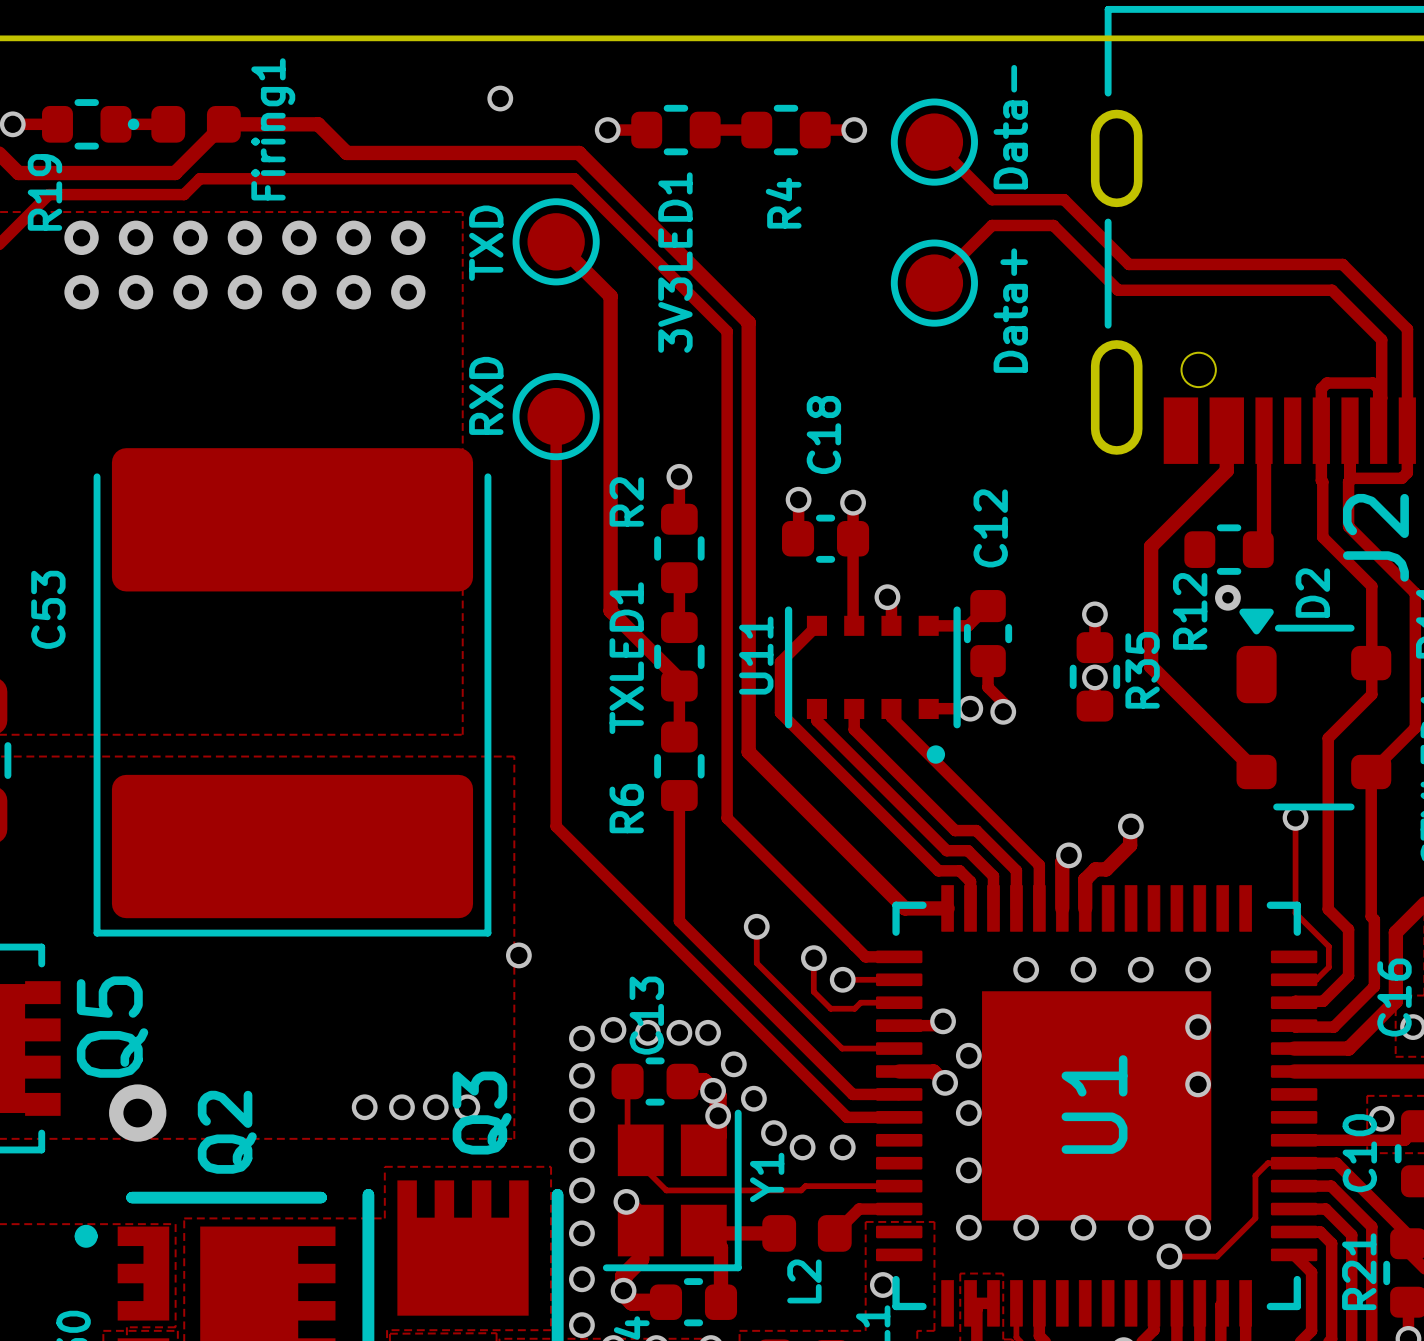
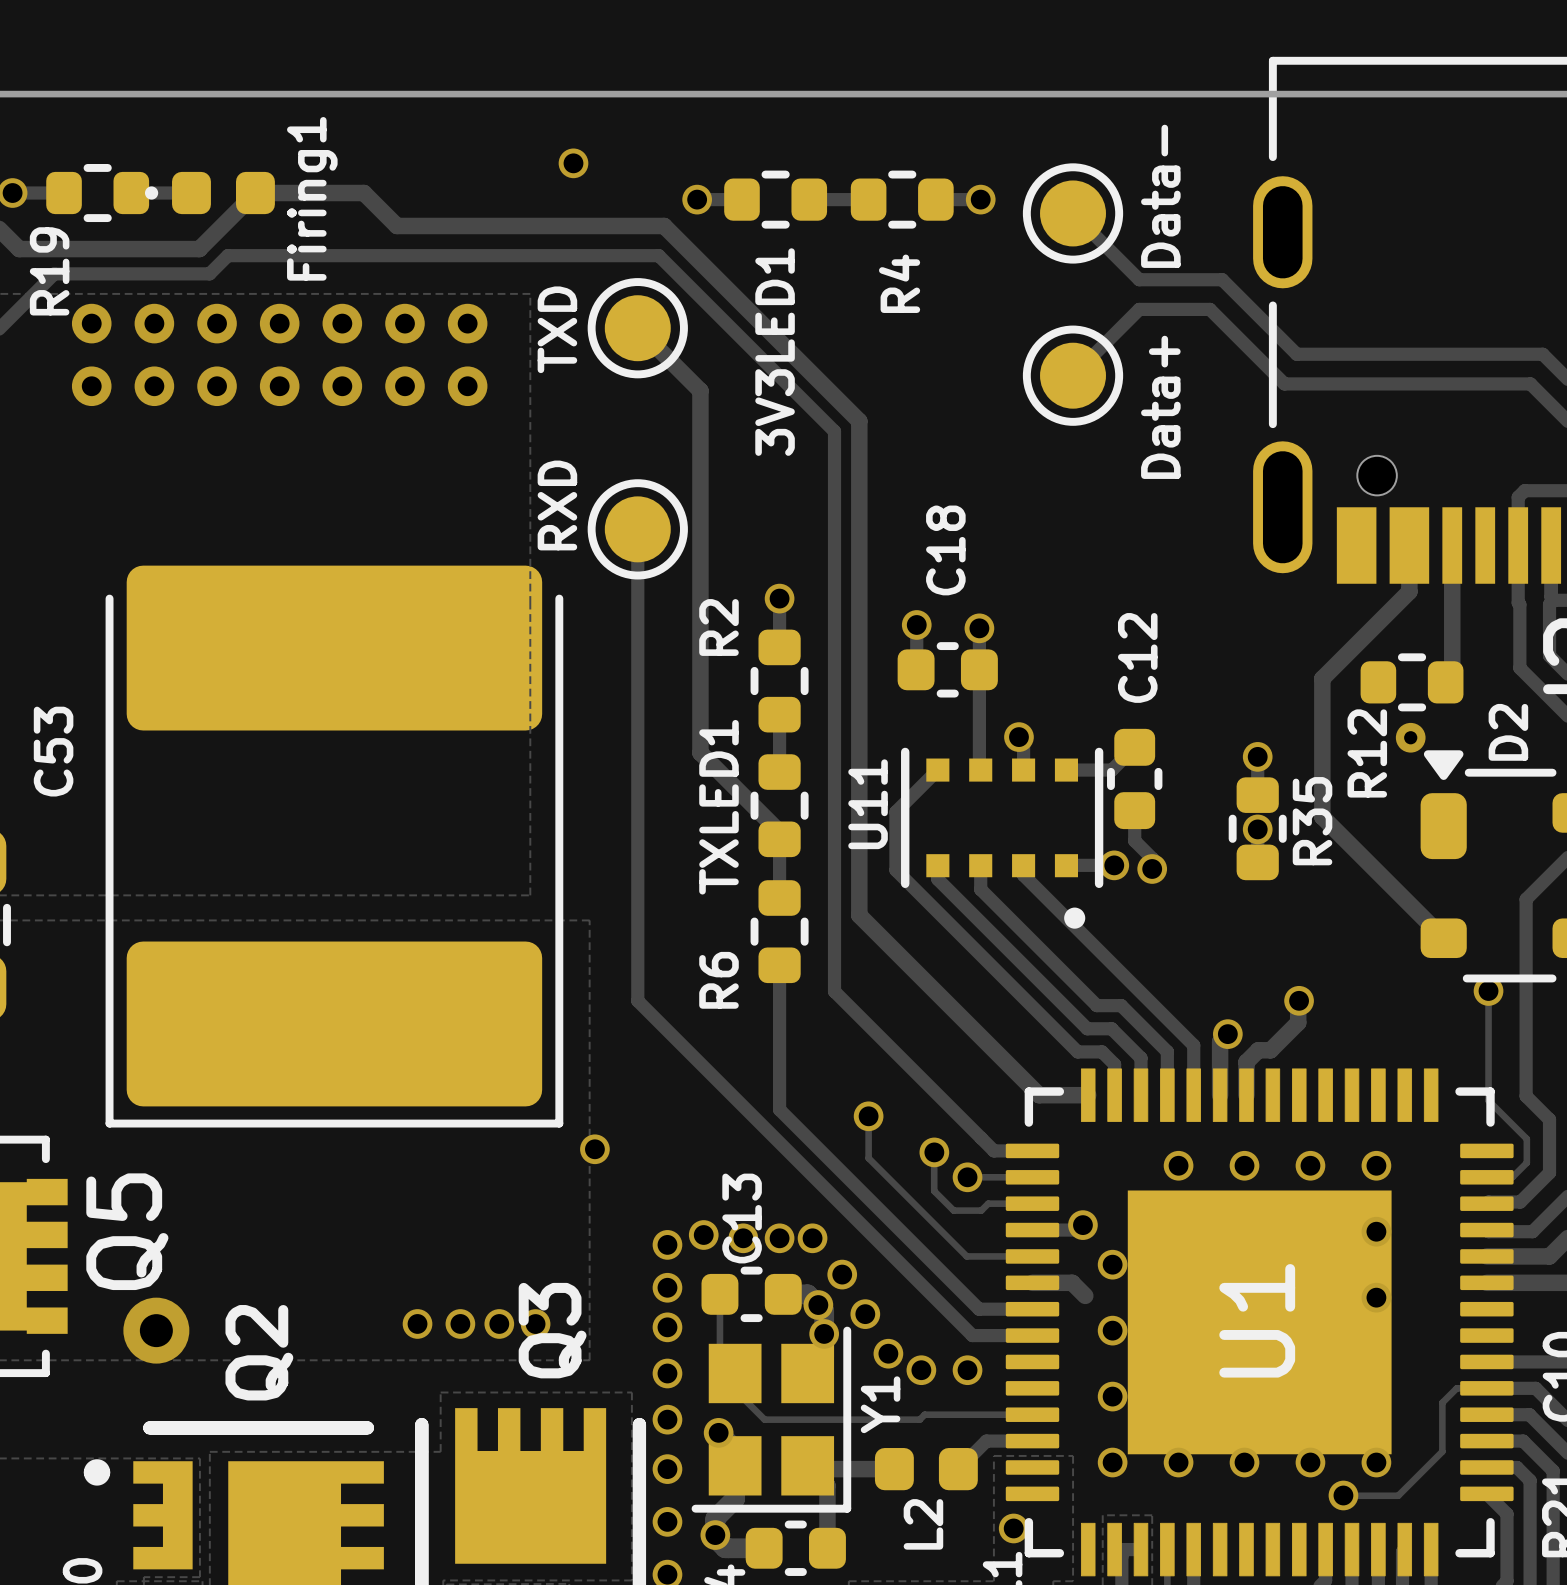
via: (945, 1082) -> none

